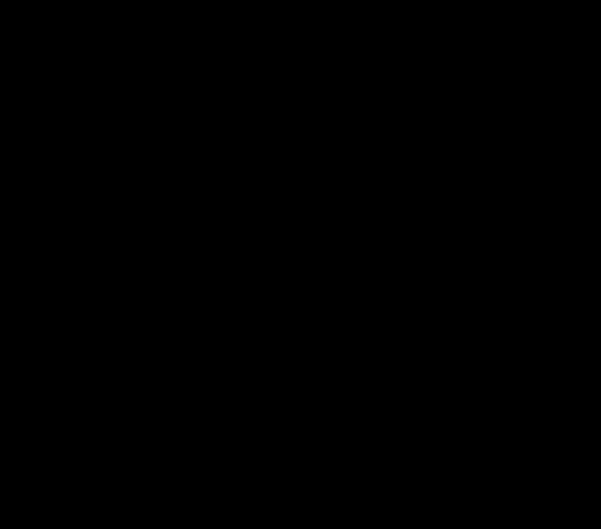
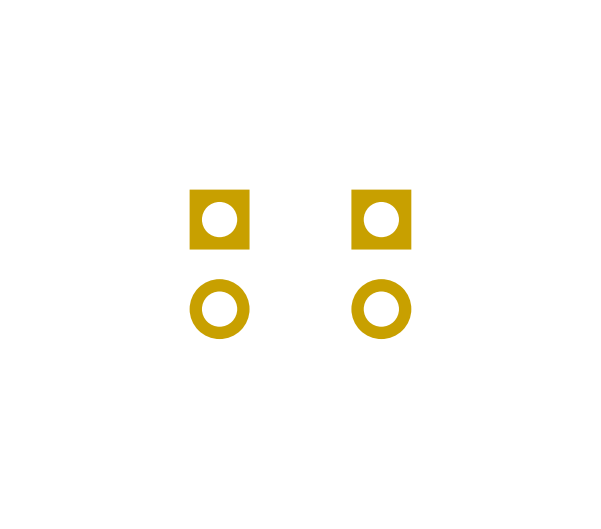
part: none -> (219, 264)
part: none -> (381, 264)

